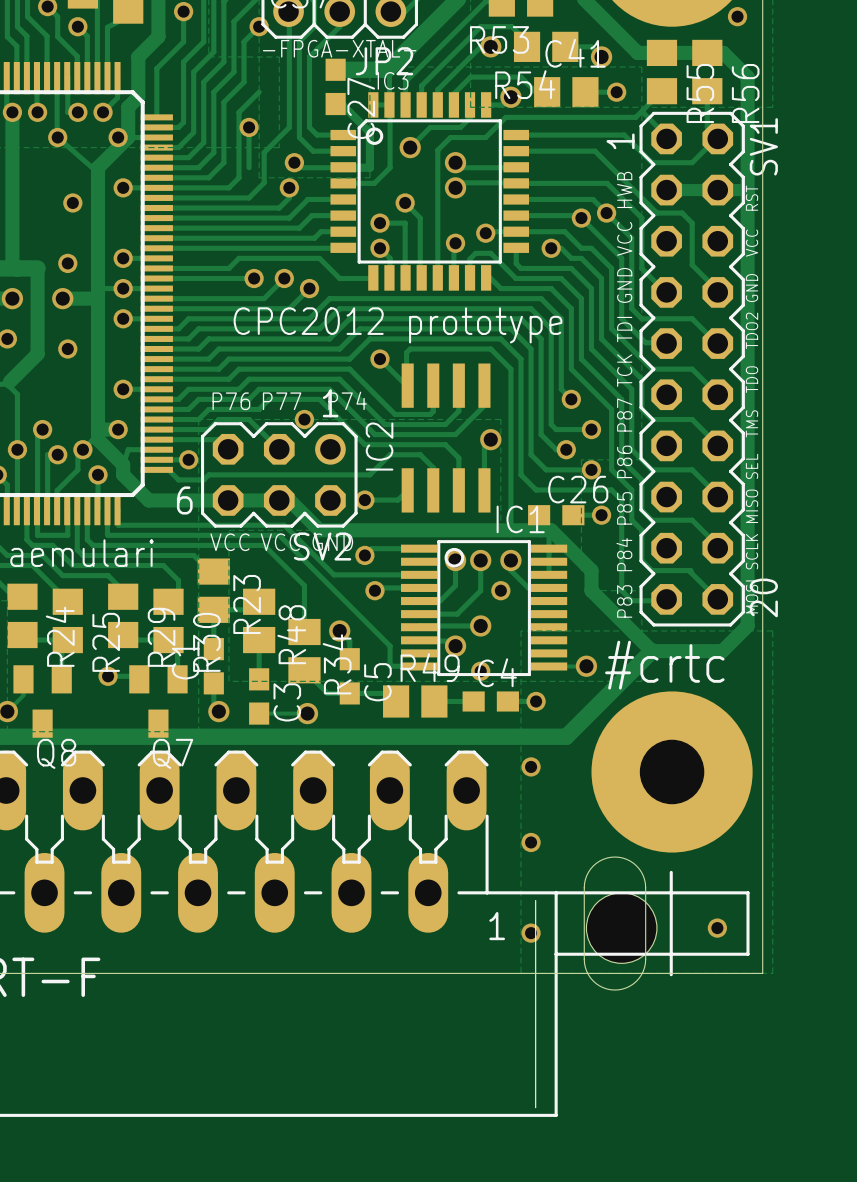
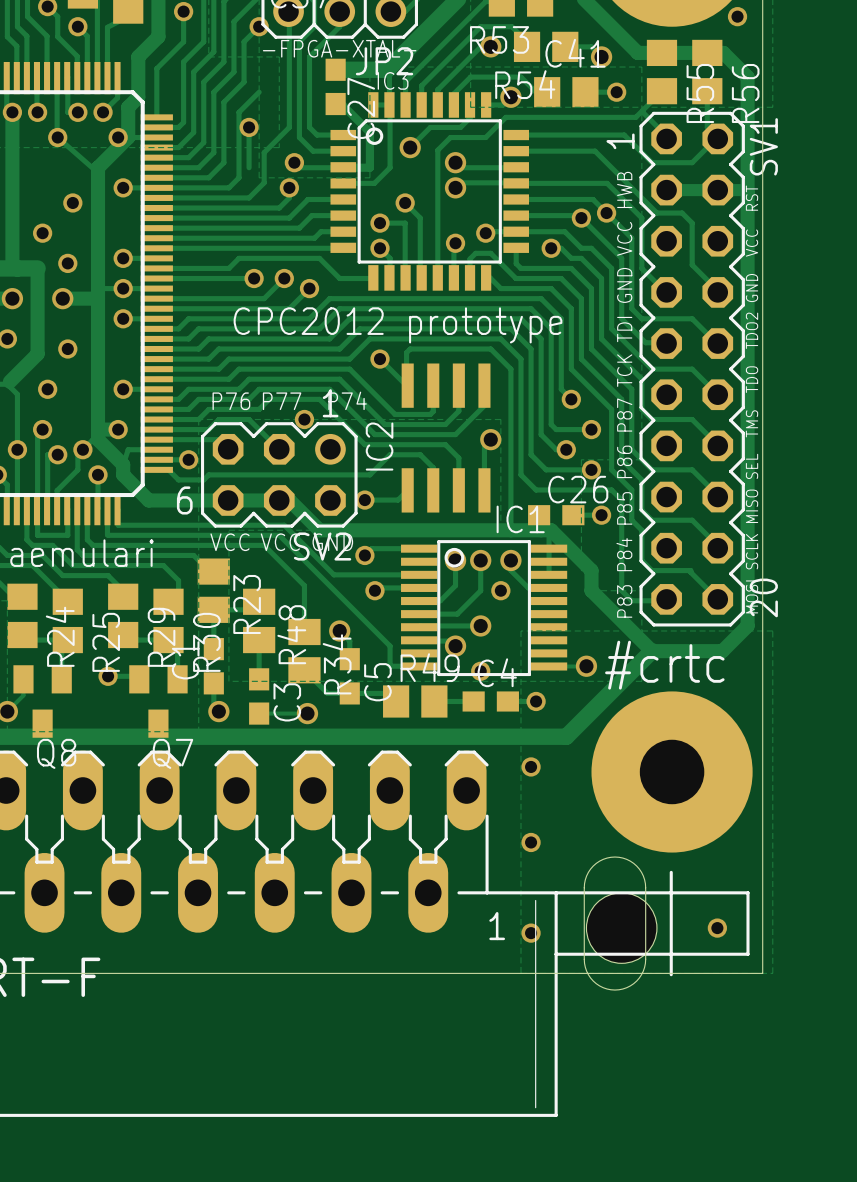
via: none -> (42, 233)
via: none -> (47, 389)

